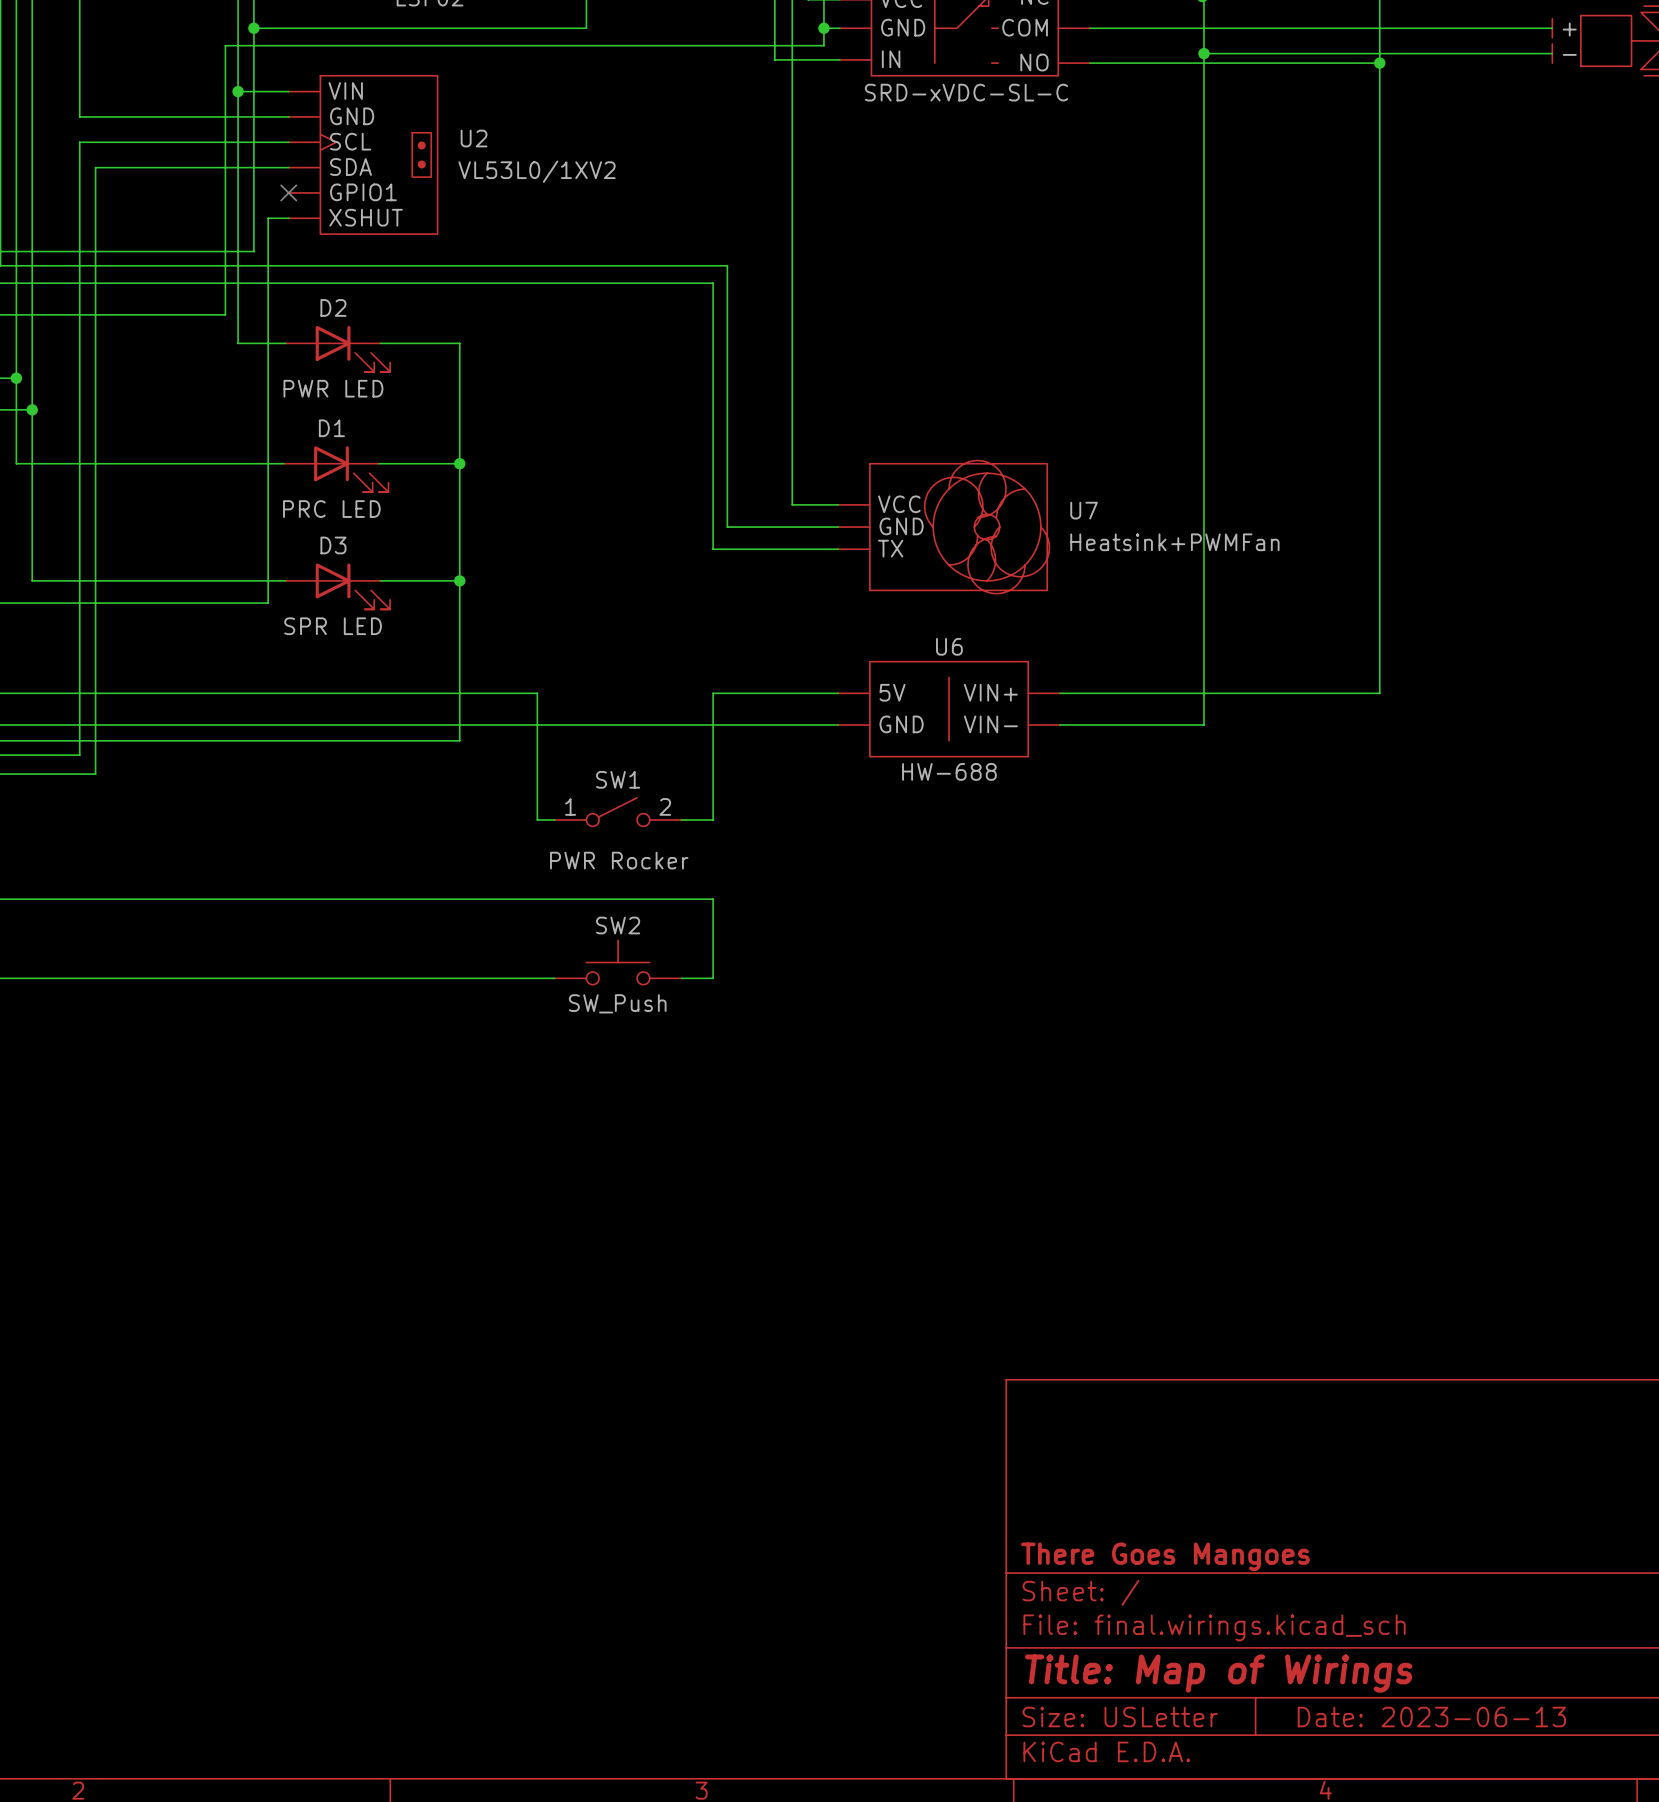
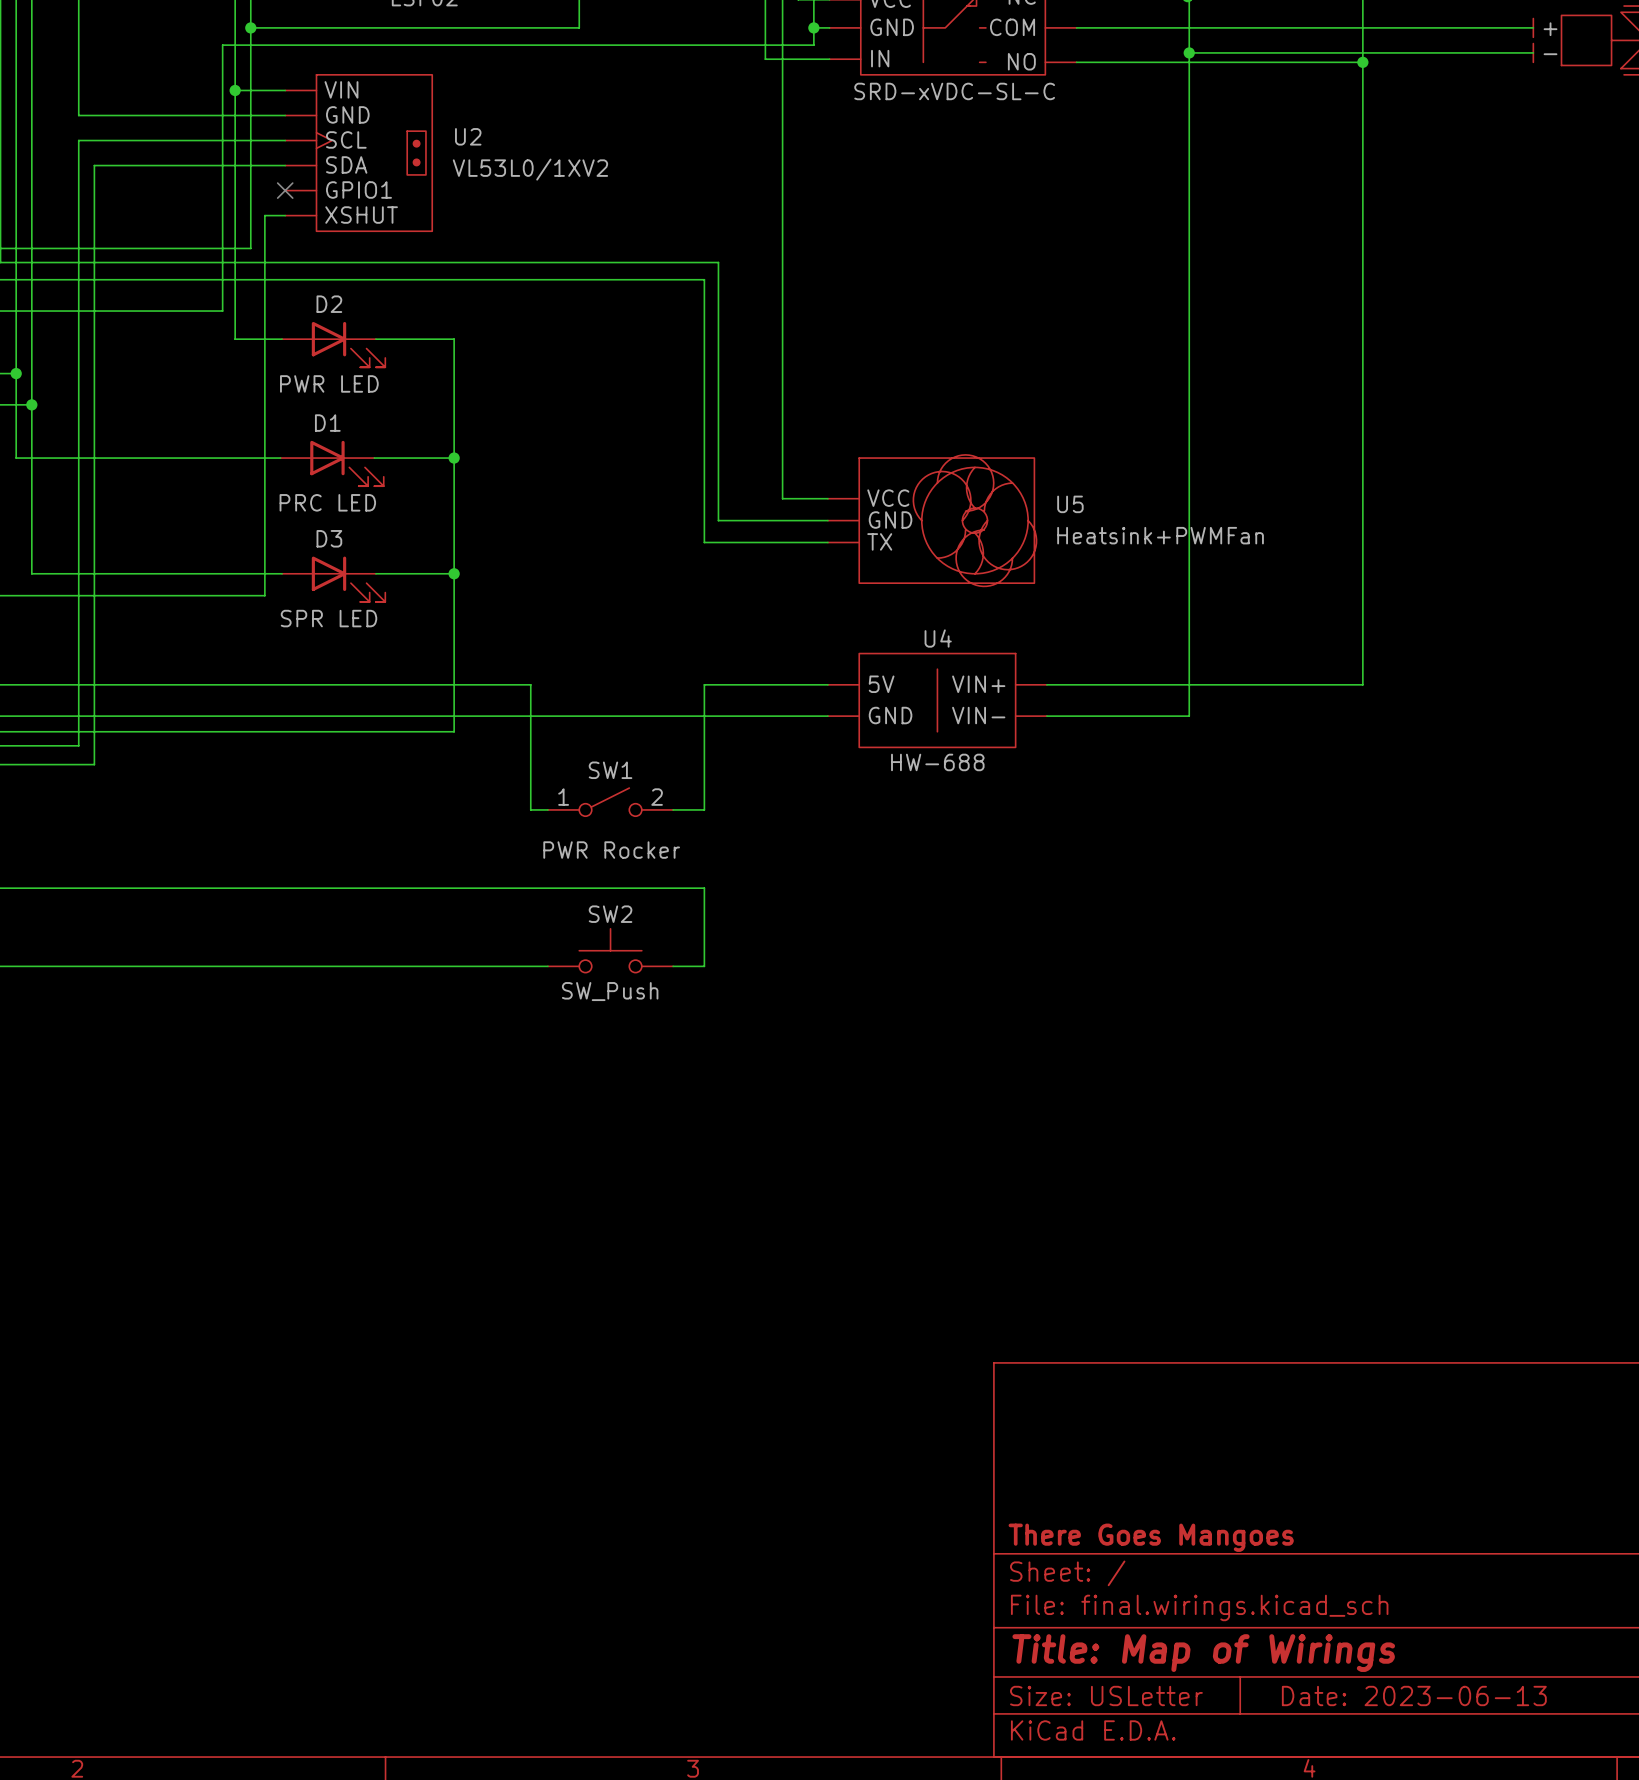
U7 name: U7 (1084, 510) -> U5 (1070, 504)
U6 name: U6 (949, 646) -> U4 (938, 638)

